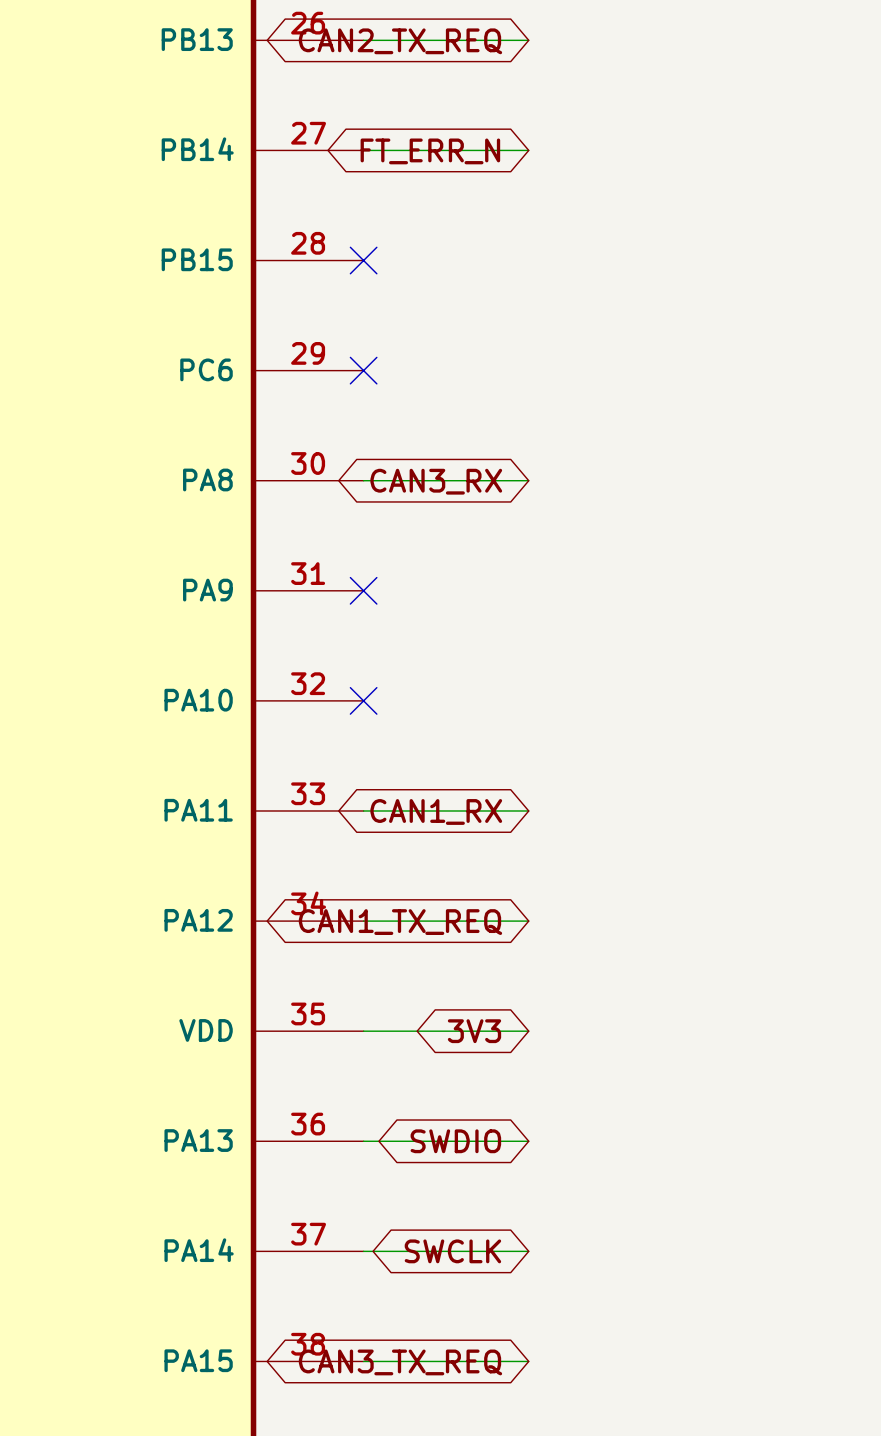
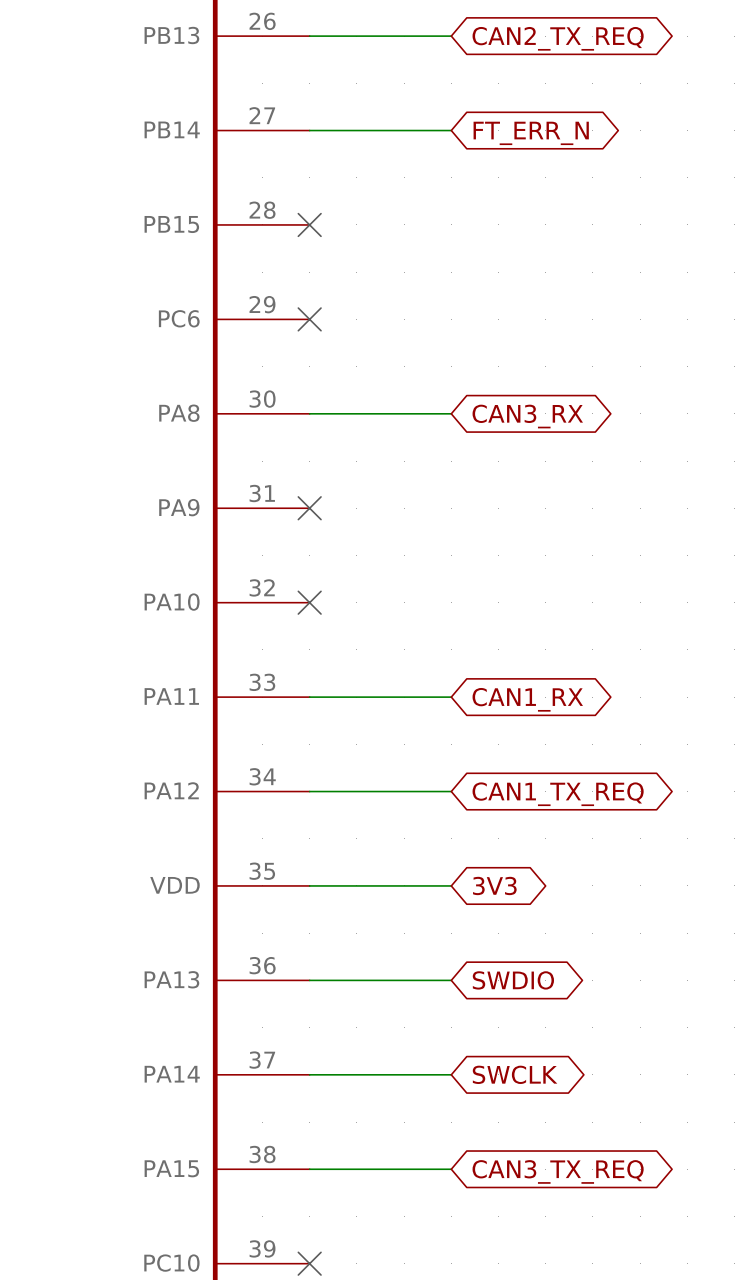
global label rotation: 0° (400, 41) -> 180° (558, 38)
global label rotation: 0° (430, 151) -> 180° (531, 133)
global label rotation: 0° (436, 481) -> 180° (527, 416)
global label rotation: 0° (436, 811) -> 180° (527, 699)
global label rotation: 0° (400, 922) -> 180° (558, 794)
global label rotation: 0° (474, 1031) -> 180° (494, 885)
global label position: 3V3 (474, 1031) -> 3V3 (494, 885)
global label rotation: 0° (455, 1141) -> 180° (513, 980)
global label rotation: 0° (452, 1251) -> 180° (515, 1074)
global label rotation: 0° (400, 1362) -> 180° (558, 1171)

